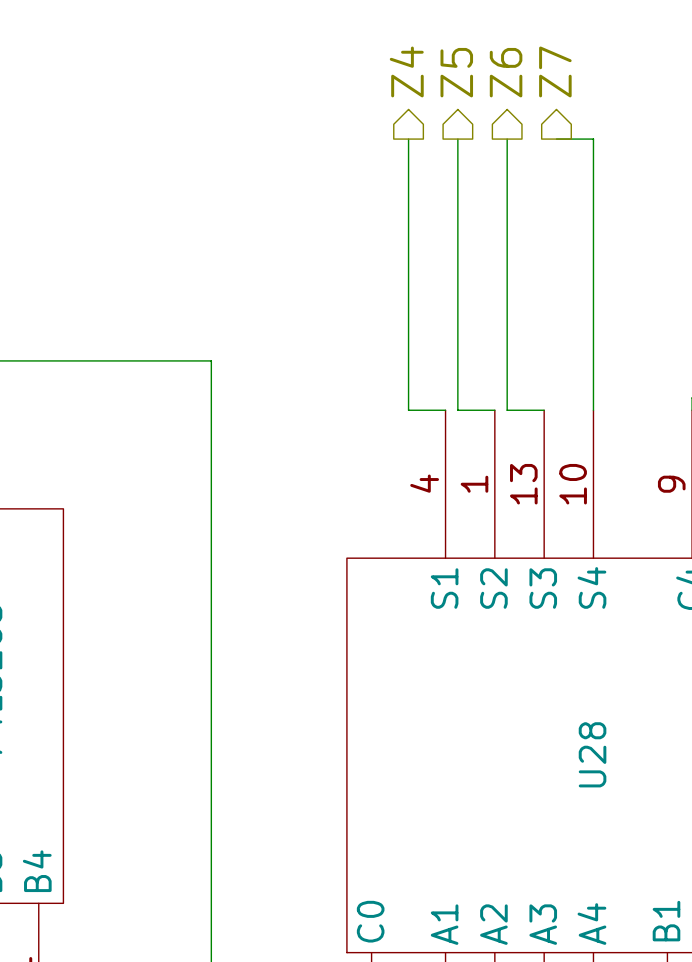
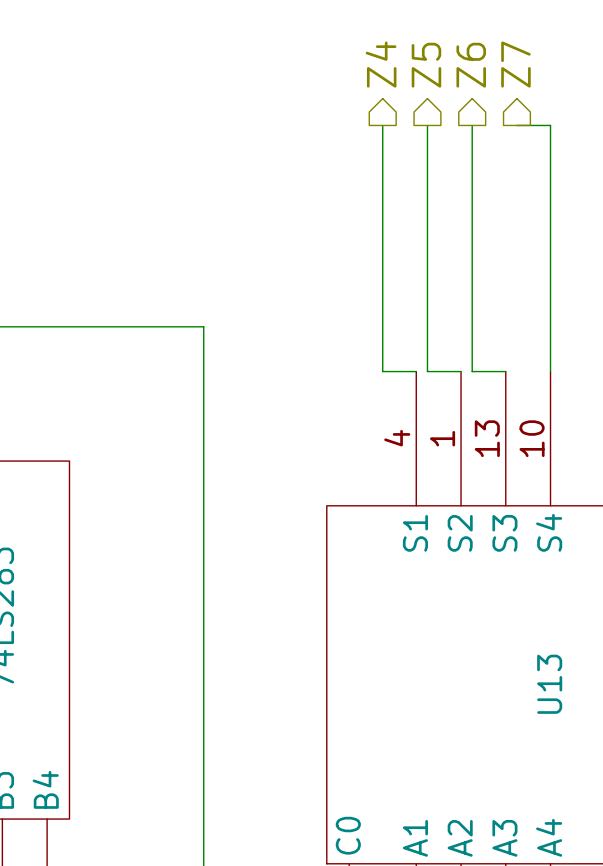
U28 name: U28 (592, 754) -> U13 (549, 684)

